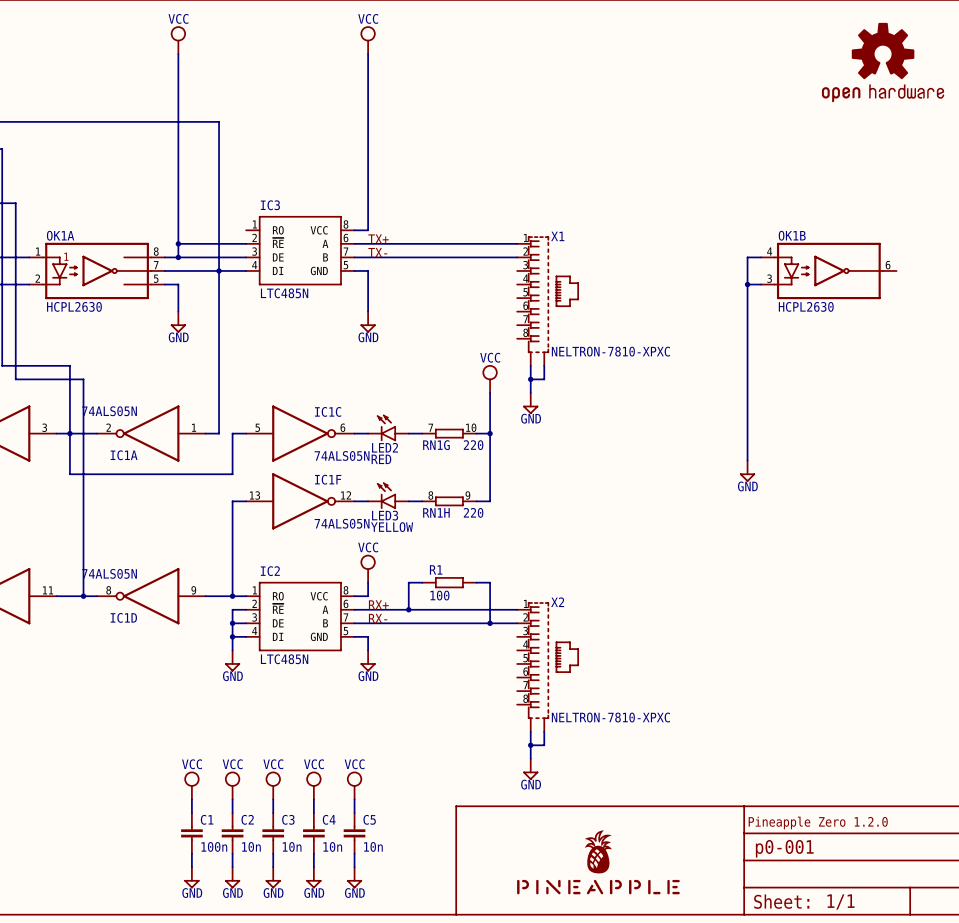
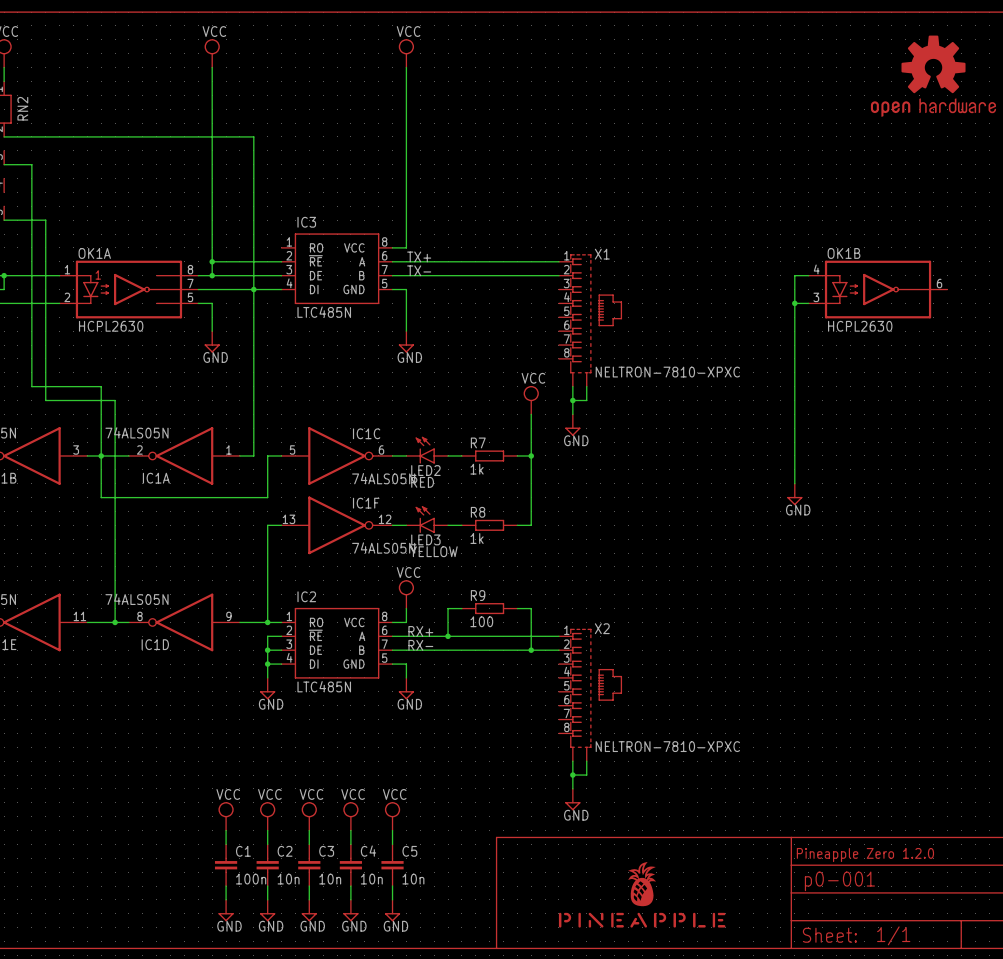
RN1G: 220 (449, 433) -> none
R7: none -> 1k (489, 455)
RN1H: 220 (449, 501) -> none
R8: none -> 1k (489, 525)
R1 name: R1 (436, 569) -> R9 (478, 595)

